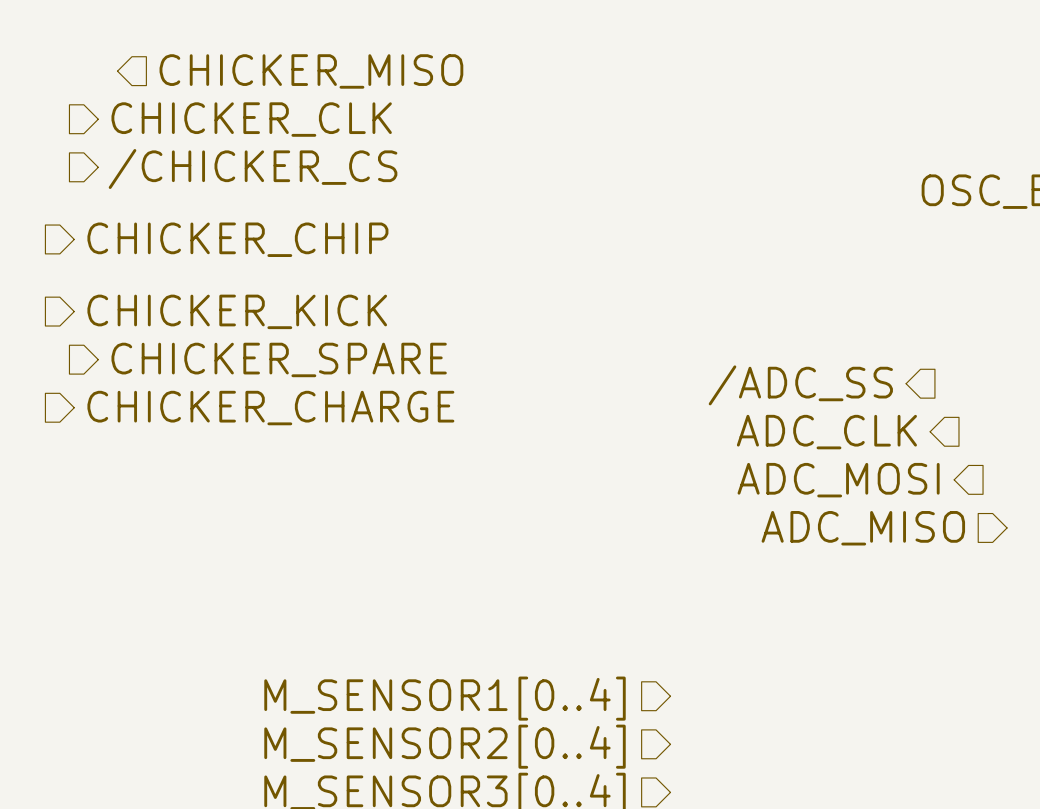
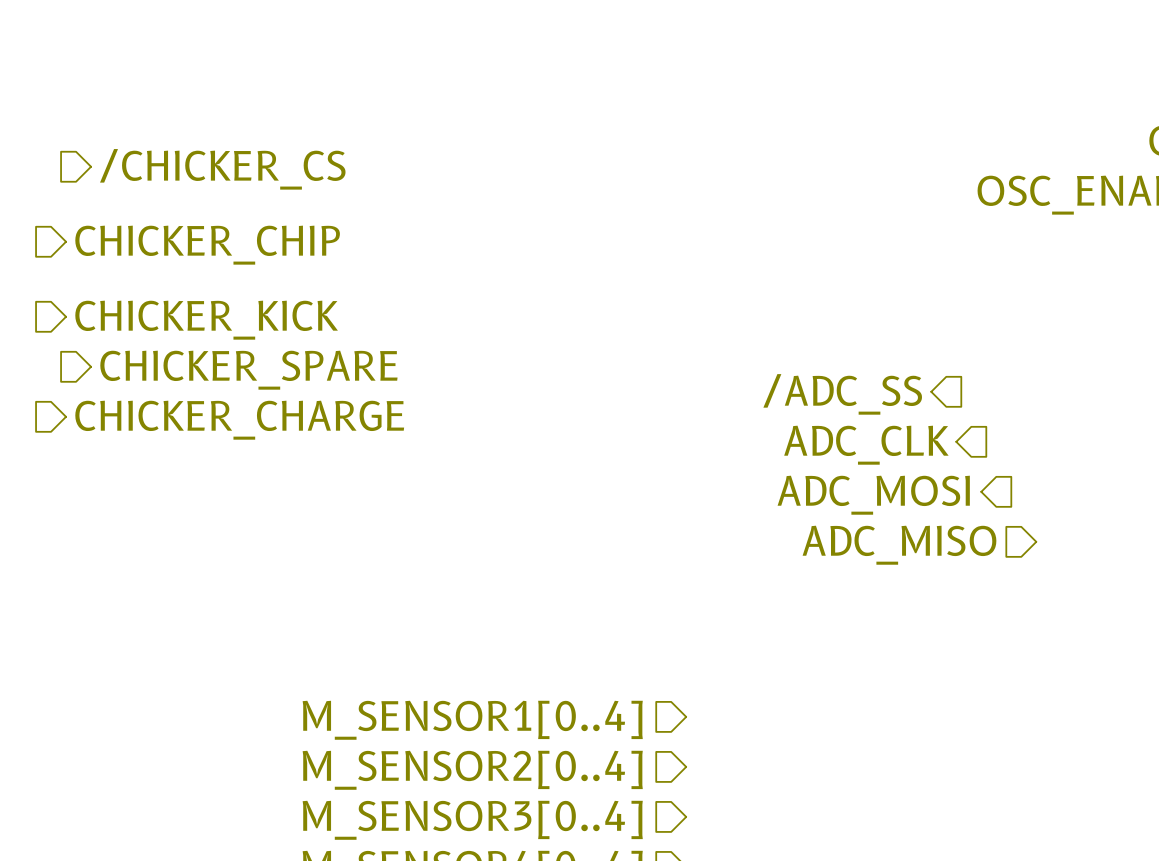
hierarchical label: CHICKER_MISO (311, 71) -> none
hierarchical label: CHICKER_CLK (251, 119) -> none

